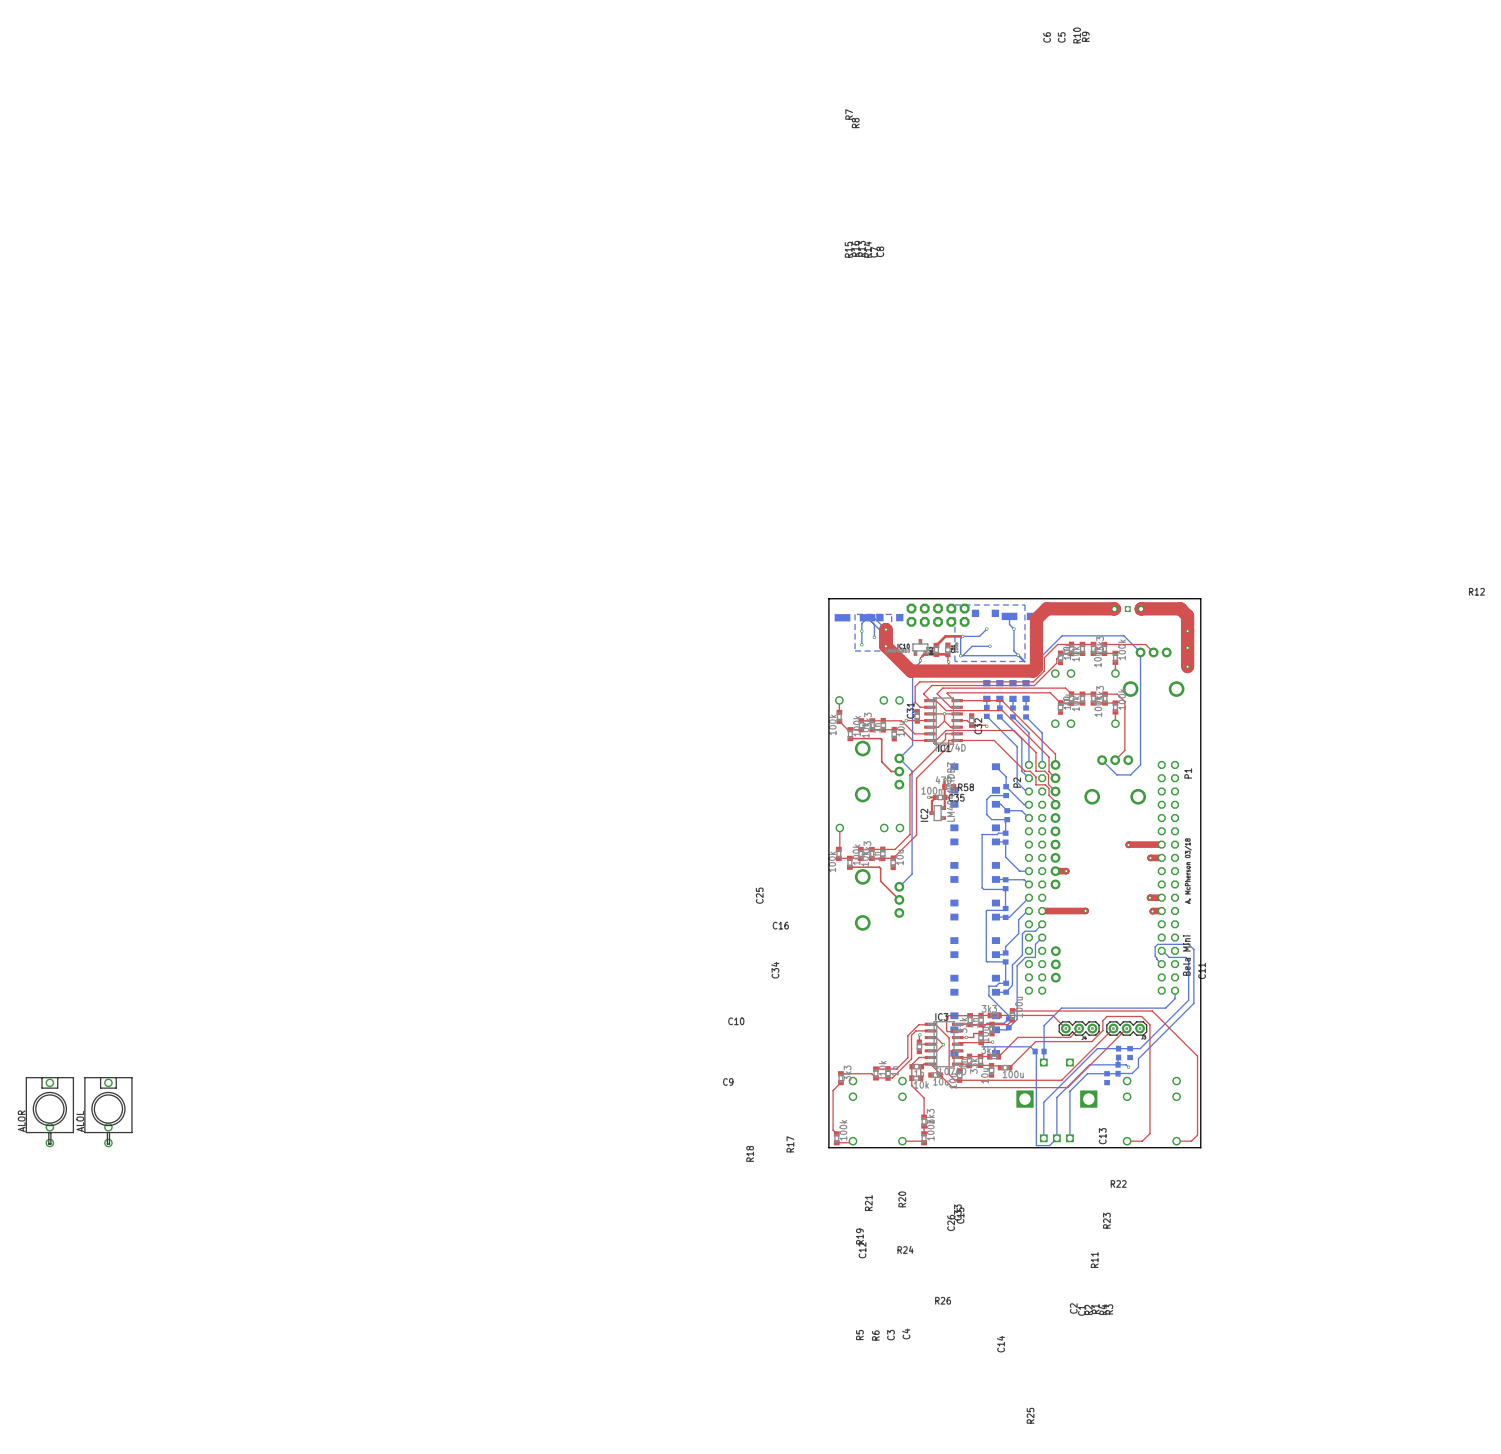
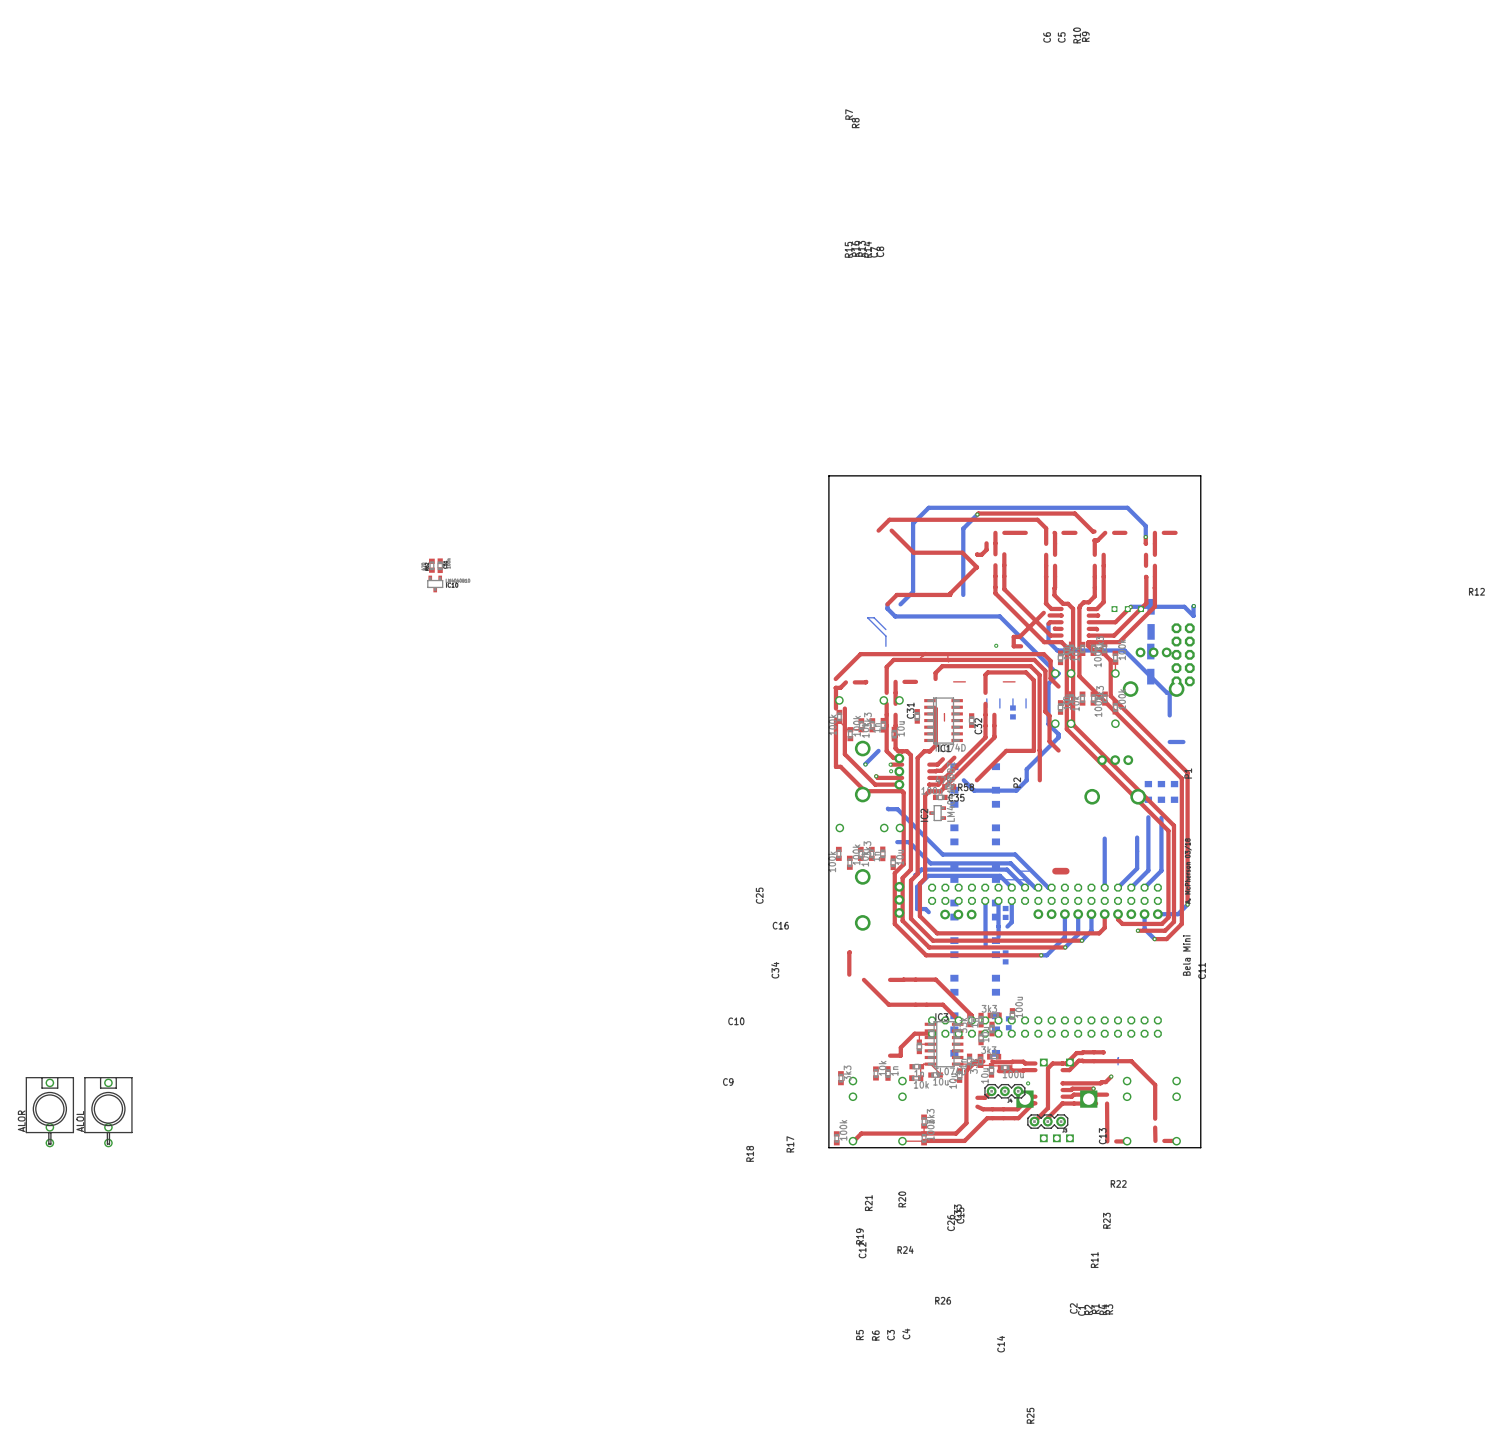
top track: none -> (977, 514) (1074, 513) (1094, 531)
bottom track: none -> (977, 514) (963, 528) (963, 594)
via: none -> (977, 514)
top track: none -> (878, 530) (889, 519) (1037, 519) (1046, 528) (1046, 543)
top track: none -> (891, 530) (913, 552) (962, 552) (977, 567) (950, 594) (896, 594) (887, 604)
top track: none -> (995, 532) (995, 554)
top track: none -> (1004, 532) (1025, 532)
top track: none -> (1054, 532) (1055, 554)
top track: none -> (1063, 532) (1075, 532)
top track: none -> (1105, 532) (1097, 540) (1094, 540) (1094, 554)
top track: none -> (1114, 532) (1125, 532)
top track: none -> (1154, 532) (1154, 554)
top track: none -> (1163, 532) (1175, 532)
top track: none -> (1145, 537) (1146, 543)
bottom track: none -> (1145, 537) (1145, 526) (1127, 507) (928, 507) (913, 523) (913, 591) (900, 604)
via: none -> (1145, 537)
top track: none -> (986, 543) (986, 549) (981, 554) (977, 554)
top track: none -> (1004, 554) (1004, 589) (1050, 635) (1061, 635)
top track: none -> (1046, 554) (1045, 603) (1051, 608) (1061, 608)
top track: none -> (1103, 554) (1103, 602) (1096, 609) (1088, 608)
top track: none -> (1146, 554) (1146, 565)
top track: none -> (995, 565) (995, 593) (1044, 642) (1061, 642) (1066, 647) (1066, 729) (1168, 830) (1168, 917) (1161, 923) (1122, 923) (1118, 919) (1118, 914)
top track: none -> (1055, 565) (1054, 595) (1063, 603) (1068, 603) (1073, 608) (1073, 724) (1174, 825) (1174, 921) (1165, 930) (1137, 930)
top track: none -> (1094, 565) (1094, 596) (1088, 602) (1083, 602) (1079, 607) (1079, 676) (1181, 778) (1181, 923) (1166, 939) (1154, 939)
top track: none -> (1154, 565) (1154, 606) (1119, 642) (1088, 642) (1088, 645) (1092, 649) (1100, 649) (1110, 660) (1110, 695) (1187, 772) (1187, 904)
top track: none -> (1146, 576) (1146, 603) (1114, 635) (1088, 635)
board edge: (828, 598) (1200, 598) -> (828, 598) (828, 475) (1200, 475) (1200, 598)
bottom track: none -> (887, 604) (887, 608) (895, 616) (999, 616) (1058, 673) (1048, 683) (1048, 724) (1058, 734) (1058, 737) (1026, 769) (1026, 780) (1016, 790) (974, 790) (963, 780)
bottom zone outline: (954, 605) (954, 661) (1024, 661) (1024, 605) (954, 605) -> none
bottom track: none -> (1193, 606) (1193, 615) (1184, 606) (1130, 607)
via: none -> (1193, 606)
top track: none -> (1130, 607) (1115, 622) (1088, 622)
via: none -> (1130, 607)
top track: (1114, 609) (1046, 608) (1036, 619) (1036, 667) (1033, 671) (910, 671) (885, 646) -> none
top track: (1141, 609) (1180, 608) (1187, 615) (1187, 666) -> none
top track: none -> (1043, 612) (1019, 636) (1013, 636) (1013, 646) (1021, 646)
part: (985, 613) -> none
bottom zone outline: (855, 614) (855, 651) (891, 651) (891, 614) (855, 614) -> none
part: (938, 615) -> none
top track: none -> (1049, 615) (1061, 615)
top track: none -> (1098, 615) (1088, 615)
bottom track: (1009, 616) (1009, 624) (1014, 629) (1014, 651) (1018, 655) -> none
part: (1022, 616) -> none
part: (855, 617) -> none
bottom track: (867, 617) (861, 623) (861, 644) -> none
part: (889, 617) -> none
part: none -> (1151, 619)
top track: none -> (1061, 622) (1048, 623)
bottom track: none -> (1048, 623) (1048, 641) (1057, 650) (1124, 650) (1167, 692) (1169, 693) (1169, 715)
bottom track: (874, 624) (874, 637) -> none
top track: none -> (1054, 628) (1061, 628)
top track: none -> (1088, 628) (1097, 629)
top track: (885, 629) (885, 646) -> none
via: (885, 629) -> none
bottom track: (986, 629) (979, 636) (962, 636) (960, 638) (960, 655) (1018, 655) -> none
via: (986, 629) -> none
via: (1014, 629) -> none
via: (861, 631) -> none
via: (1187, 631) -> none
top track: (962, 636) (945, 636) (936, 645) -> none
via: (962, 636) -> none
via: (874, 637) -> none
via: (861, 644) -> none
top track: (1093, 644) (1057, 644) (1044, 657) (1044, 670) (1033, 681) (1015, 681) -> none
top track: (1104, 644) (1145, 644) (1153, 652) -> none
via: none -> (996, 645)
via: (885, 646) -> none
bottom track: (989, 646) (972, 646) (962, 655) -> none
via: (989, 646) -> none
part rotation: 0° (920, 647) -> 180° (435, 583)
part position: (920, 647) -> (435, 583)
via: (1187, 647) -> none
part position: (936, 649) -> (431, 565)
part position: (947, 649) -> (440, 565)
top track: (1082, 653) (1060, 653) (1056, 658) (1056, 663) (1034, 685) (931, 685) (923, 693) (930, 700) -> none
top track: (1093, 653) (1115, 653) -> none
part: none -> (1183, 654)
via: (960, 655) -> none
bottom track: (1018, 655) (1024, 661) -> none
via: (1018, 655) -> none
bottom track: (920, 660) (912, 669) (912, 745) (899, 758) (912, 771) (912, 874) (899, 886) -> none
via: (920, 660) -> none
bottom track: (948, 661) (948, 667) (954, 672) (1024, 672) (1062, 635) (1123, 635) (1140, 652) (1140, 764) (1130, 774) (1116, 774) (1102, 760) -> none
via: (948, 661) -> none
part: none -> (1150, 664)
via: (1187, 666) -> none
top track: none -> (835, 678) (860, 654) (1043, 654) (1050, 660) (1050, 678) (1058, 686)
top track: none -> (935, 678) (935, 672) (942, 666) (1030, 666) (1039, 675) (1039, 780)
top track: none -> (866, 681) (854, 682)
top track: none -> (895, 681) (895, 703)
top track: none -> (904, 681) (915, 681)
top track: (953, 681) (919, 681) (915, 686) (915, 702) (920, 707) (929, 707) -> none
top track: (965, 681) (1003, 681) -> none
top track: none -> (845, 682) (840, 687) (835, 687)
top track: none -> (835, 687) (835, 708)
part: (986, 691) -> none
part: (999, 691) -> none
part: (1012, 691) -> none
part: (1026, 691) -> none
top track: none -> (886, 692) (886, 666) (893, 659) (1034, 659) (1045, 670) (1045, 711) (1049, 715) (1049, 741) (1058, 750)
top track: none -> (985, 692) (985, 674) (987, 672) (1026, 672) (1033, 680) (1033, 750) (1006, 750) (976, 780)
top track: (1093, 694) (1071, 694) (1065, 688) (942, 688) (937, 693) (950, 707) (957, 707) -> none
top track: (1104, 694) (1117, 694) (1124, 701) (1124, 750) (1115, 760) -> none
top track: (839, 700) (839, 712) -> none
top track: (929, 700) (936, 700) (946, 710) (1002, 710) (1049, 757) (1049, 771) (1055, 778) -> none
top track: none -> (886, 703) (886, 751) (893, 757) (902, 757)
top track: none -> (985, 703) (985, 737) (938, 784) (929, 784)
top track: (1082, 703) (1060, 703) (1050, 692) (947, 693) (954, 700) (1001, 700) (1055, 754) (1055, 764) -> none
top track: (1093, 703) (1115, 703) -> none
top track: none -> (844, 708) (844, 754) (875, 784) (902, 784)
top track: none -> (935, 708) (935, 745) (929, 751) (924, 751) (917, 757) (917, 873) (911, 880) (911, 918) (932, 940) (1081, 940)
part: (986, 711) -> none
top track: (1115, 711) (1115, 723) -> none
part: (999, 712) -> none
part: (1026, 712) -> none
top track: (929, 713) (957, 713) -> none
via: (944, 713) -> none
top track: none -> (895, 714) (895, 748) (898, 751) (907, 751) (910, 755) (910, 869) (902, 877) (902, 920) (929, 947) (1065, 947)
top track: none -> (994, 714) (994, 737) (940, 791) (929, 791) (925, 795) (925, 878) (919, 883) (919, 916) (937, 933) (1099, 933) (1104, 927) (1104, 914)
bottom track: (986, 716) (1017, 746) (1017, 782) (1026, 791) (1028, 791) -> none
bottom track: (999, 716) (1021, 738) (1021, 771) (1028, 778) -> none
bottom track: (1012, 716) (1028, 732) (1028, 764) -> none
bottom track: (1026, 716) (1042, 733) (1042, 764) -> none
top track: none -> (835, 719) (835, 766) (840, 766) (865, 791) (902, 791) (903, 792) (903, 864) (894, 873) (894, 923) (926, 955) (1041, 955)
top track: (861, 720) (901, 720) (914, 733) (929, 733) -> none
top track: (906, 720) (929, 720) -> none
via: (906, 720) -> none
top track: (957, 720) (967, 720) (971, 725) (986, 726) -> none
via: (986, 726) -> none
top track: (929, 727) (938, 727) (944, 721) (950, 727) (957, 727) -> none
top track: (872, 729) (902, 729) (912, 740) (936, 740) (946, 730) (1014, 730) (1035, 752) (1035, 771) (1044, 771) (1048, 774) (1048, 784) (1055, 791) -> none
top track: (957, 733) (945, 733) (945, 739) (909, 774) (909, 834) (895, 849) (860, 849) -> none
top track: (850, 738) (880, 738) (881, 761) (891, 771) (899, 771) -> none
bottom track: none -> (1169, 741) (1183, 741)
bottom track: none -> (878, 750) (865, 764)
top track: none -> (954, 757) (941, 770) (929, 771)
top track: none -> (942, 759) (937, 764) (929, 764)
via: none -> (865, 764)
via: none -> (890, 764)
top track: none -> (891, 764) (902, 764)
bottom track: (995, 766) (1006, 776) (1006, 786) (1024, 804) (1028, 804) -> none
via: none -> (891, 771)
top track: none -> (950, 773) (945, 777) (929, 777)
top track: none -> (876, 776) (877, 777) (902, 777)
via: none -> (876, 776)
top track: (944, 779) (943, 808) -> none
via: (944, 779) -> none
part: (1006, 791) -> none
part: none -> (1148, 791)
part: none -> (1161, 791)
part: none -> (1174, 791)
bottom track: (1006, 795) (990, 795) (986, 799) (986, 814) (991, 819) (1007, 819) (1005, 833) (982, 834) (982, 887) (983, 889) (1005, 888) -> none
top track: (928, 797) (935, 797) (931, 801) (931, 813) -> none
via: (928, 797) -> none
bottom track: (995, 804) (1000, 804) (1007, 810) (1021, 810) (1028, 818) -> none
top track: (1055, 804) (1055, 801) (1049, 795) (1049, 788) (1045, 784) (1035, 784) (1035, 777) (1030, 771) (1024, 771) (994, 740) (948, 740) (948, 746) (916, 778) (916, 835) (893, 858) (871, 858) -> none
bottom track: none -> (887, 808) (897, 809) (942, 854) (1015, 854) (1048, 887) (1051, 887)
part: (1007, 815) -> none
bottom track: none -> (1148, 817) (1148, 870) (1131, 887)
bottom track: none -> (1161, 817) (1161, 870) (1144, 887)
part rotation: 0° (1055, 824) -> 90° clockwise (1098, 914)
part position: (1055, 824) -> (1098, 914)
top track: (839, 828) (838, 849) -> none
part: (1005, 837) -> none
bottom track: none -> (1137, 837) (1137, 868) (1118, 887)
bottom track: none -> (1104, 838) (1104, 887)
bottom track: (995, 841) (1005, 841) (1005, 857) (1019, 871) -> none
bottom track: none -> (897, 842) (909, 842) (930, 863) (1010, 863) (1035, 887) (1038, 887)
via: (1128, 844) -> none
top track: (1161, 844) (1128, 844) -> none
top track: (1161, 857) (1150, 858) -> none
top track: (838, 858) (860, 858) -> none
via: (1150, 858) -> none
top track: (849, 867) (879, 867) (880, 881) (899, 899) -> none
via: (1066, 871) -> none
bottom track: none -> (915, 875) (921, 869) (1007, 869) (1025, 887)
part rotation: 0° (1035, 877) -> 90° clockwise (1044, 894)
part: (1168, 877) -> none
part: (1005, 884) -> none
bottom track: none -> (1011, 887) (999, 875) (928, 875) (917, 886) (917, 909) (925, 909) (928, 912)
bottom track: (1005, 888) (1005, 908) (1003, 910) (986, 911) (986, 961) (1005, 961) (1006, 983) (988, 986) (988, 995) (1008, 1015) (1008, 1018) (1004, 1023) (987, 1023) (983, 1027) (983, 1046) (1030, 1046) (1036, 1052) (1036, 1145) (1049, 1145) (1056, 1138) (1056, 1097) (1089, 1064) (1126, 1064) (1128, 1067) -> none
bottom track: (1028, 897) (1009, 917) (995, 917) -> none
via: (1149, 897) -> none
top track: (1150, 897) (1161, 897) -> none
bottom track: none -> (985, 900) (985, 945)
bottom track: none -> (998, 900) (998, 936)
bottom track: none -> (1011, 900) (1011, 922) (1007, 926)
bottom track: none -> (1187, 904) (1178, 914) (1157, 914)
via: none -> (1187, 904)
top track: (1085, 910) (1042, 911) -> none
via: (1085, 910) -> none
bottom track: (1028, 911) (1018, 919) (1018, 933) (1005, 946) (1005, 952) (995, 954) -> none
via: (1152, 911) -> none
top track: (1161, 911) (1152, 911) -> none
bottom track: none -> (1064, 914) (1064, 937) (1046, 955) (1041, 955)
bottom track: none -> (1078, 914) (1078, 934) (1065, 947)
bottom track: none -> (1091, 914) (1091, 930) (1081, 940)
bottom track: none -> (1144, 914) (1144, 929) (1154, 939)
bottom track: (1042, 924) (1035, 931) (1024, 931) (1022, 933) (1022, 955) (1012, 965) (1012, 985) (1006, 992) (995, 992) -> none
via: none -> (1137, 930)
bottom track: (1042, 937) (1035, 944) (1035, 957) (1025, 957) (1017, 965) (1017, 1019) (1006, 1029) (995, 1029) -> none
via: none -> (1154, 939)
via: none -> (1081, 940)
via: none -> (1065, 947)
bottom track: (1161, 950) (1169, 957) (1186, 957) (1188, 960) (1188, 1000) (1140, 1048) (1097, 1048) (1043, 1102) (1043, 1138) -> none
top track: none -> (849, 952) (849, 974)
via: none -> (1041, 955)
part rotation: 0° (1055, 964) -> 90° clockwise (958, 914)
part position: (1055, 964) -> (958, 914)
bottom track: (1161, 964) (1155, 956) (1155, 946) (1157, 944) (1188, 943) (1193, 949) (1193, 1003) (1138, 1058) (1138, 1067) (1132, 1073) (1087, 1073) (1069, 1091) (1069, 1138) -> none
top track: none -> (863, 979) (888, 1004) (942, 1004) (958, 1020)
top track: none -> (890, 979) (935, 979) (971, 1015) (971, 1020)
part: (1006, 987) -> none
bottom track: (1175, 990) (1175, 998) (1165, 1008) (1061, 1008) (1044, 1025) (1043, 1062) -> none
top track: (1012, 1010) (1152, 1010) (1197, 1056) (1197, 1135) (1191, 1141) (1176, 1141) -> none
top track: (990, 1015) (948, 1015) (946, 1017) (946, 1030) (957, 1030) -> none
top track: (999, 1015) (1052, 1015) (1065, 1028) -> none
top track: (1012, 1019) (1007, 1024) (957, 1024) -> none
part: none -> (1044, 1027)
top track: (1079, 1028) (1070, 1037) (1017, 1037) (998, 1056) -> none
part position: (1079, 1028) -> (1004, 1091)
top track: (1113, 1028) (1061, 1080) (954, 1080) (949, 1074) (949, 1038) (935, 1024) (918, 1024) (907, 1035) (907, 1057) (896, 1069) (875, 1069) -> none
top track: (1126, 1028) (1067, 1087) (952, 1087) (940, 1074) -> none
part position: (1126, 1028) -> (1047, 1121)
top track: (930, 1030) (915, 1030) (911, 1035) (911, 1058) (892, 1077) (875, 1077) (871, 1073) (840, 1073) -> none
top track: none -> (932, 1033) (914, 1033) (900, 1047) (900, 1055) (890, 1055)
top track: (981, 1033) (973, 1033) (973, 1037) (957, 1037) -> none
via: (919, 1034) -> none
top track: (930, 1037) (936, 1037) (943, 1044) (937, 1050) (930, 1050) -> none
via: (966, 1037) -> none
top track: (992, 1042) (957, 1044) -> none
via: (992, 1042) -> none
via: (943, 1044) -> none
part: (1039, 1051) -> none
top track: none -> (1103, 1052) (1076, 1053) (1066, 1063) (1062, 1063)
part: (1118, 1053) -> none
part: (1130, 1053) -> none
top track: (989, 1056) (957, 1057) -> none
top track: (930, 1057) (919, 1057) (911, 1067) (911, 1085) (924, 1098) (924, 1117) -> none
top track: none -> (983, 1061) (975, 1061) (966, 1070) (966, 1123) (956, 1133) (861, 1133) (854, 1140)
top track: none -> (992, 1061) (1035, 1063)
top track: none -> (1062, 1063) (1052, 1063) (1047, 1068) (1047, 1108) (1034, 1121)
top track: (1009, 1067) (1035, 1041) (1091, 1041) (1102, 1030) (1102, 1020) (1107, 1016) (1141, 1016) (1149, 1024) (1149, 1133) (1142, 1141) (1127, 1141) -> none
via: (1128, 1067) -> none
part: (1118, 1069) -> none
top track: none -> (1035, 1070) (998, 1071)
top track: none -> (1062, 1070) (1069, 1070) (1078, 1060) (1131, 1061) (1155, 1084) (1155, 1118)
top track: none -> (1111, 1076) (1105, 1082) (1100, 1083) (1062, 1083)
via: none -> (1111, 1076)
part: (1107, 1078) -> none
top track: (840, 1082) (833, 1090) (833, 1130) (836, 1133) -> none
via: none -> (1028, 1083)
top track: none -> (1093, 1088) (1062, 1090)
via: none -> (1093, 1088)
top track: none -> (991, 1091) (985, 1097) (977, 1097)
top track: none -> (1107, 1094) (1073, 1094) (1071, 1096) (1062, 1096)
top track: none -> (1035, 1096) (1030, 1096) (1017, 1109) (983, 1109) (977, 1106)
top track: none -> (1035, 1103) (1018, 1118) (987, 1118) (964, 1140) (923, 1140)
top track: none -> (1096, 1103) (1062, 1103) (1047, 1118) (1047, 1121)
top track: none -> (1107, 1103) (1107, 1141)
top track: none -> (1155, 1127) (1155, 1140)
top track: none -> (1127, 1140) (1116, 1141)
top track: none -> (1164, 1140) (1176, 1140)
top track: (852, 1141) (836, 1142) -> none

